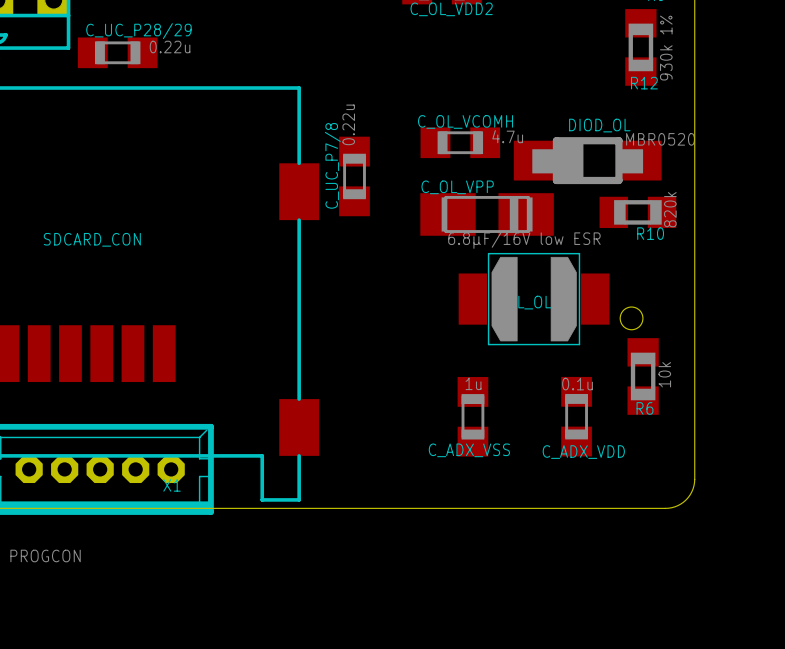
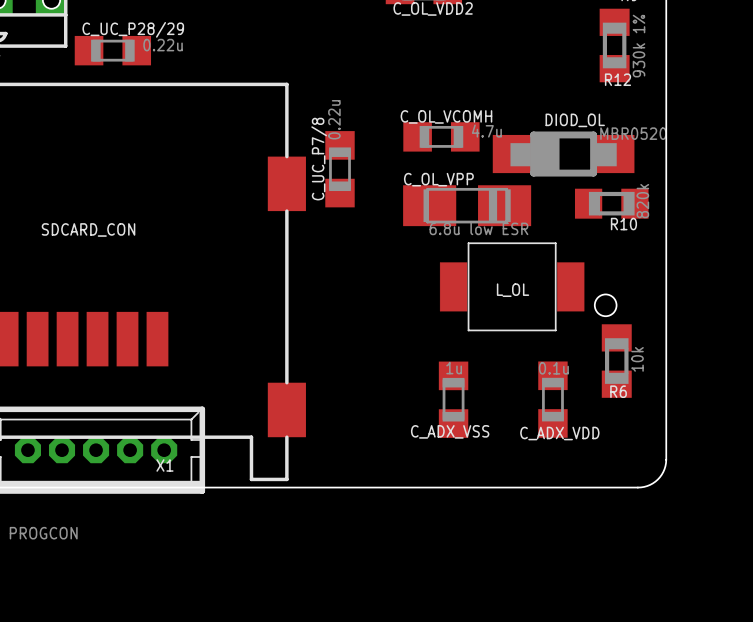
C_OL_VPP value: 6.8µF/16V low ESR (524, 240) -> 6.8u low ESR (478, 228)
part footprint: [458, 252, 610, 346] -> [439, 242, 585, 332]

